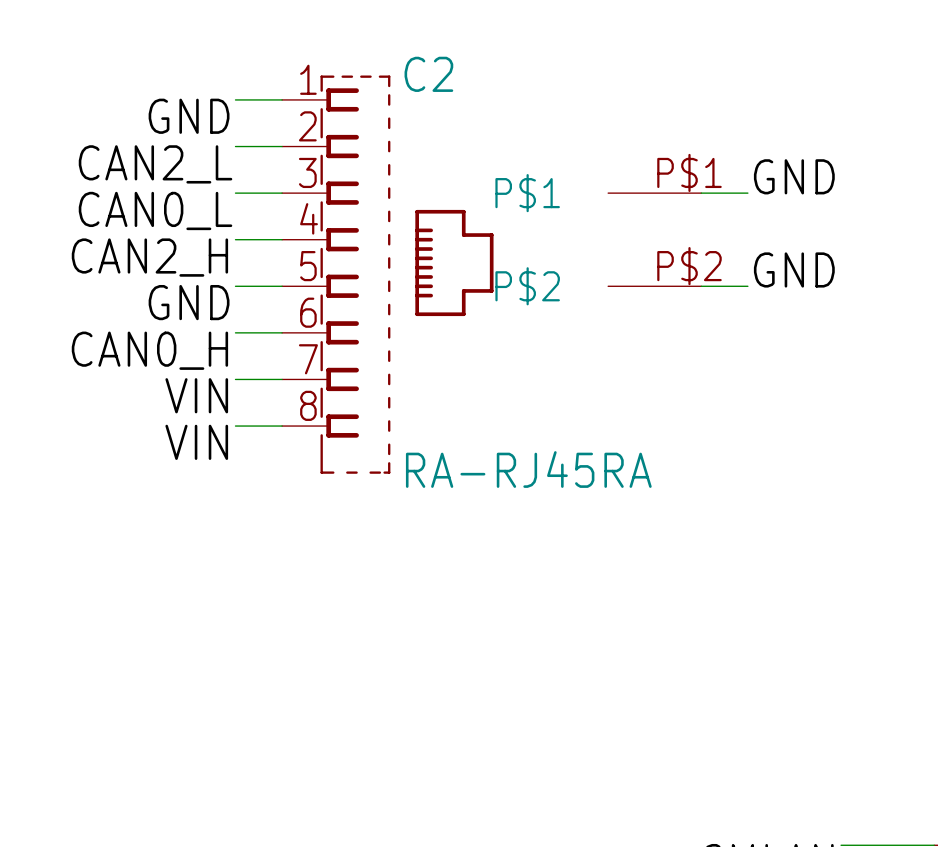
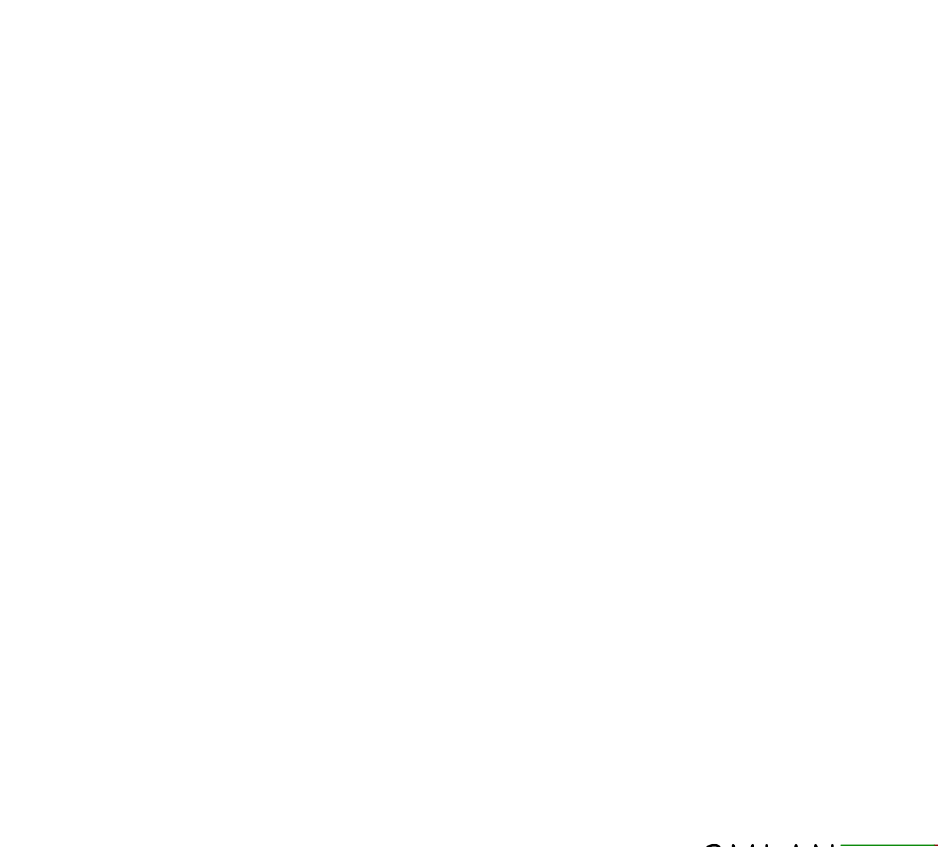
wire: (235, 99) (282, 99) -> none
label: GND (189, 116) -> none
wire: (235, 146) (282, 146) -> none
label: CAN2_L (155, 164) -> none
label: GND (794, 176) -> none
wire: (235, 193) (282, 193) -> none
wire: (701, 193) (747, 193) -> none
label: CAN0_L (155, 210) -> none
wire: (235, 239) (282, 239) -> none
label: CAN2_H (149, 257) -> none
label: GND (794, 269) -> none
C2: RA-RJ45RA (491, 274) -> none
wire: (235, 286) (282, 286) -> none
wire: (701, 286) (747, 286) -> none
label: GND (189, 302) -> none
wire: (235, 332) (282, 332) -> none
label: CAN0_H (149, 350) -> none
wire: (235, 379) (282, 379) -> none
label: VIN (196, 395) -> none
wire: (235, 426) (282, 426) -> none
label: VIN (196, 442) -> none

